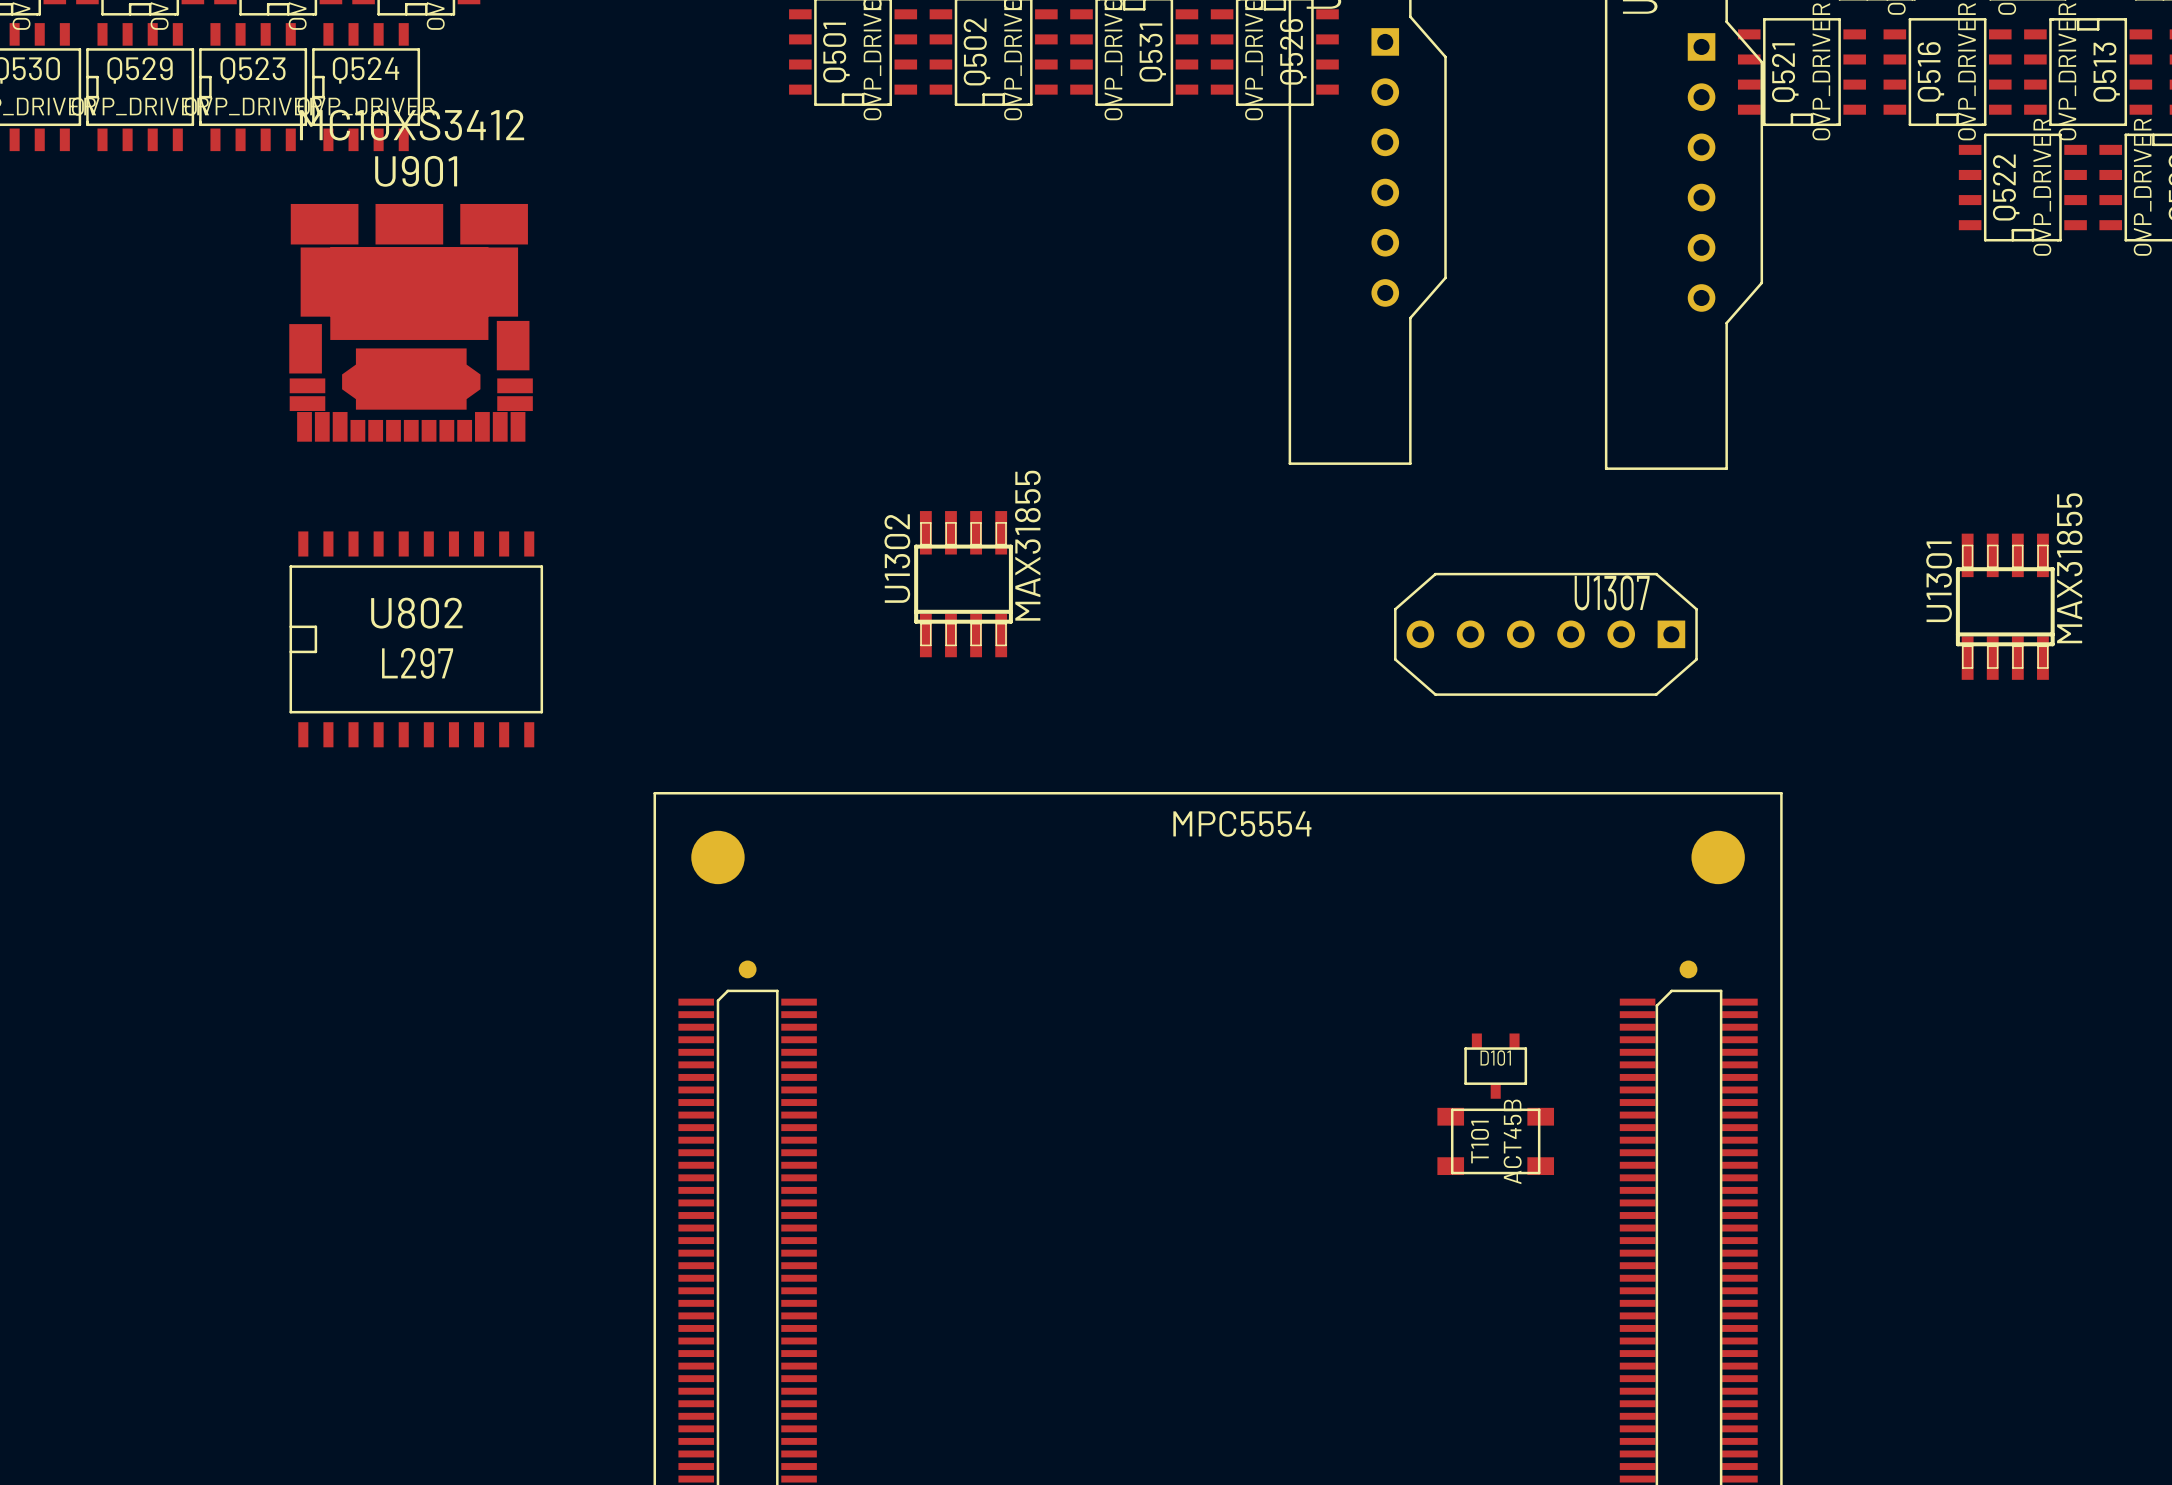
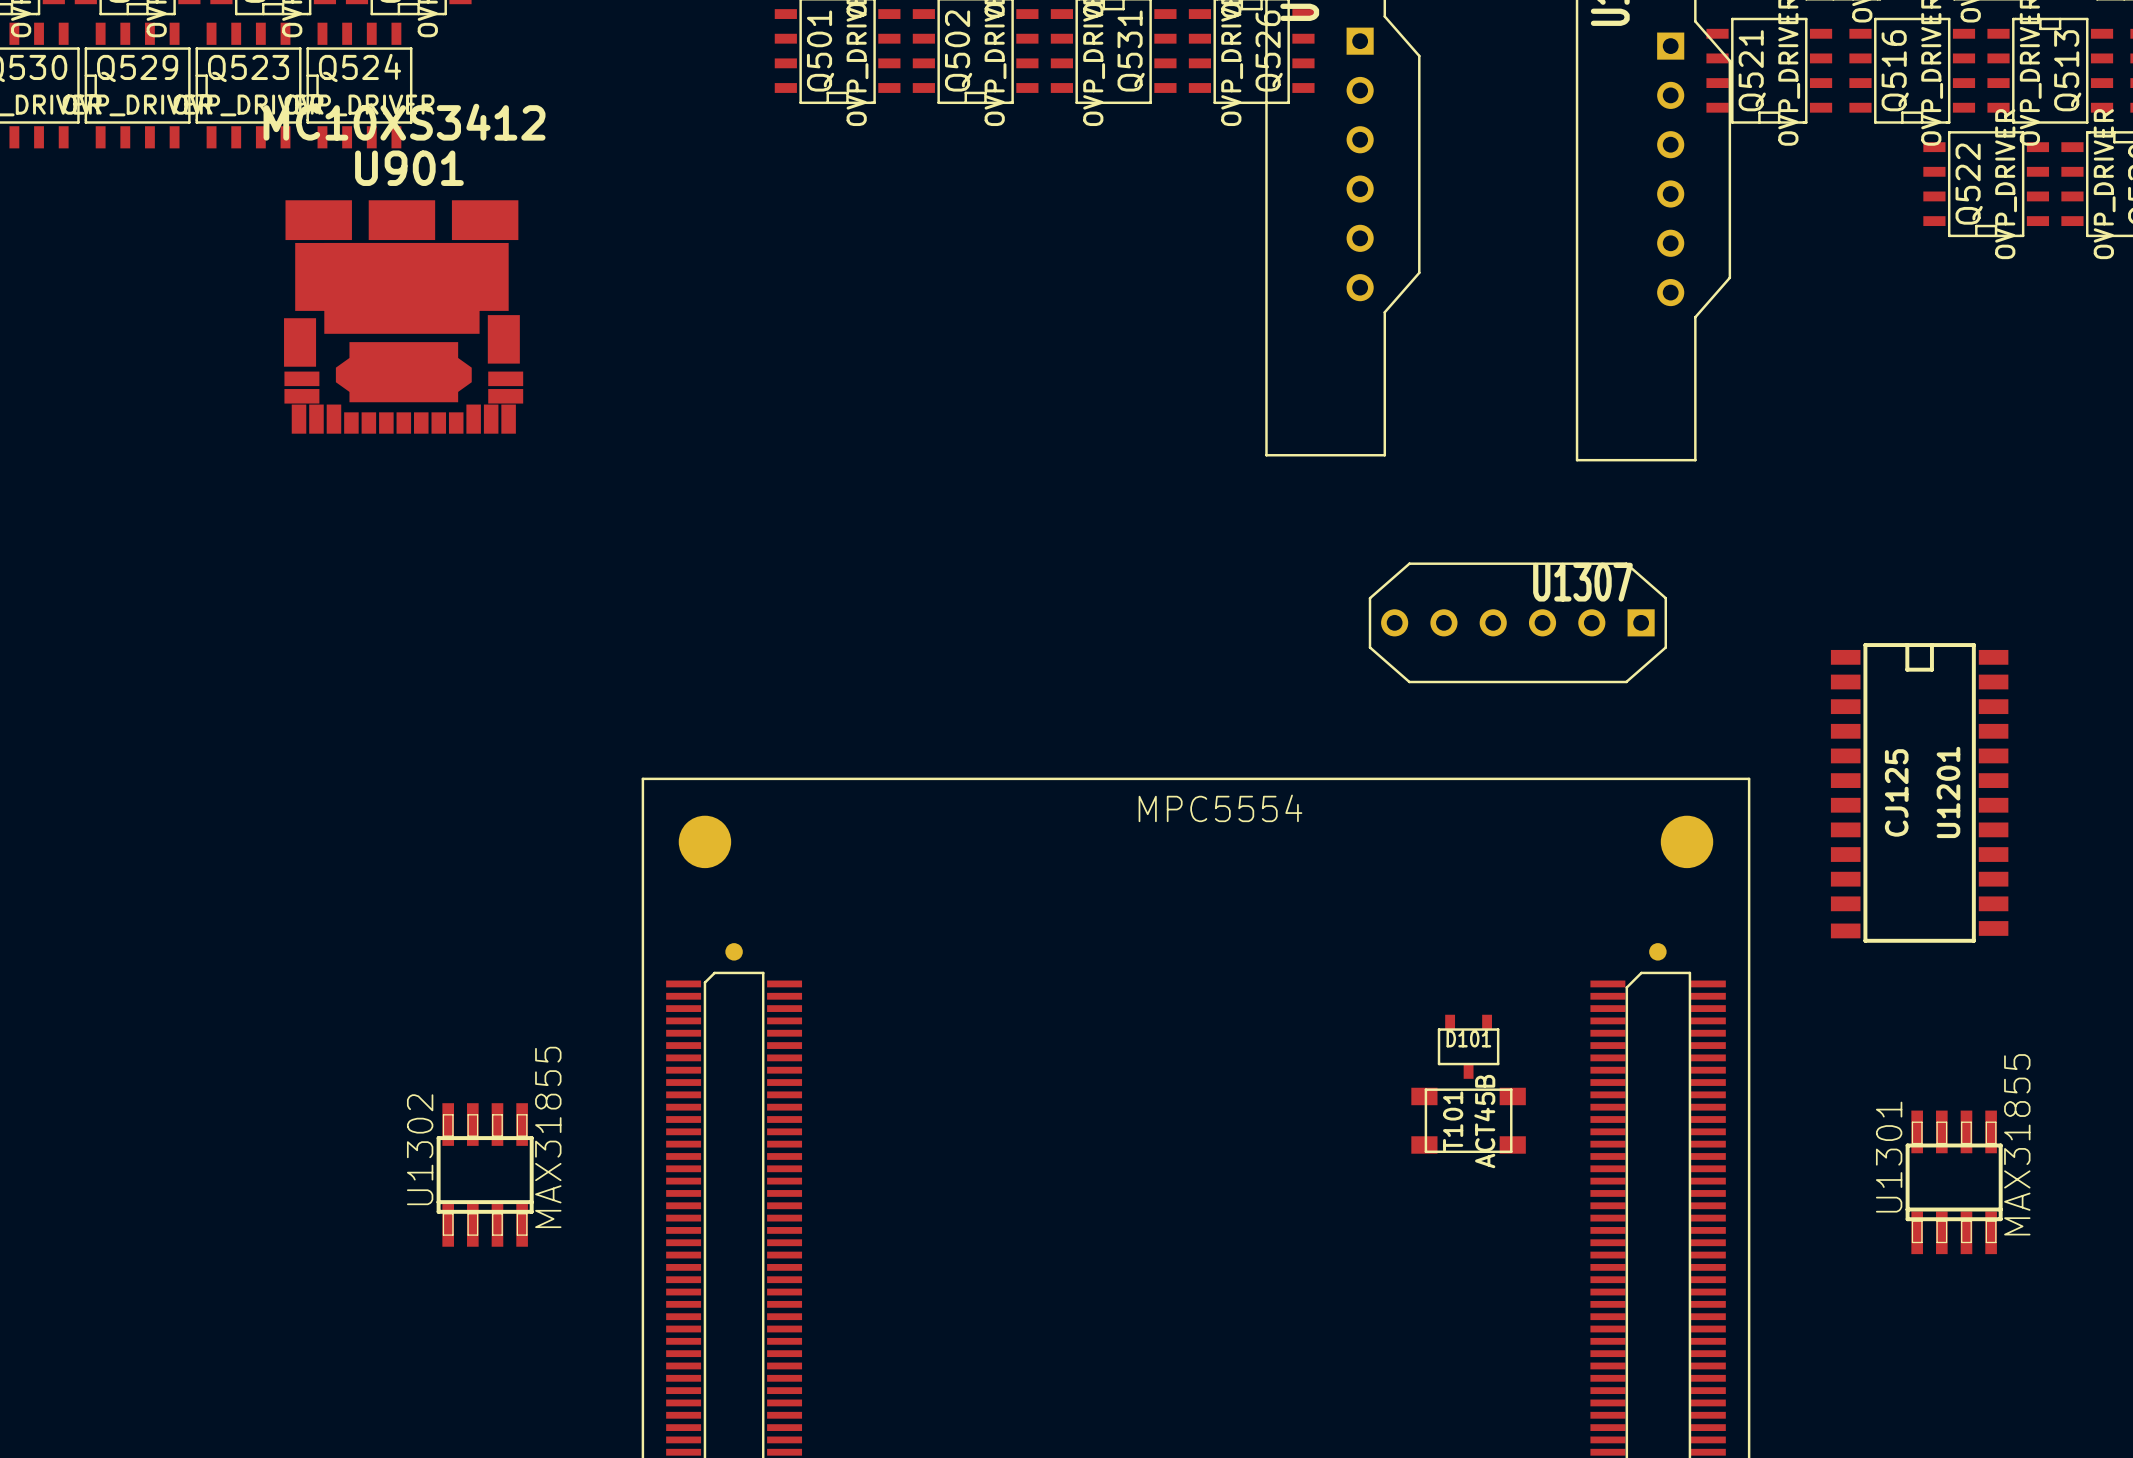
U1302 position: (963, 584) -> (485, 1174)
U1301 position: (2005, 606) -> (1954, 1182)
U802: L297 (416, 639) -> none
U1201: none -> CJ125 (1919, 792)

